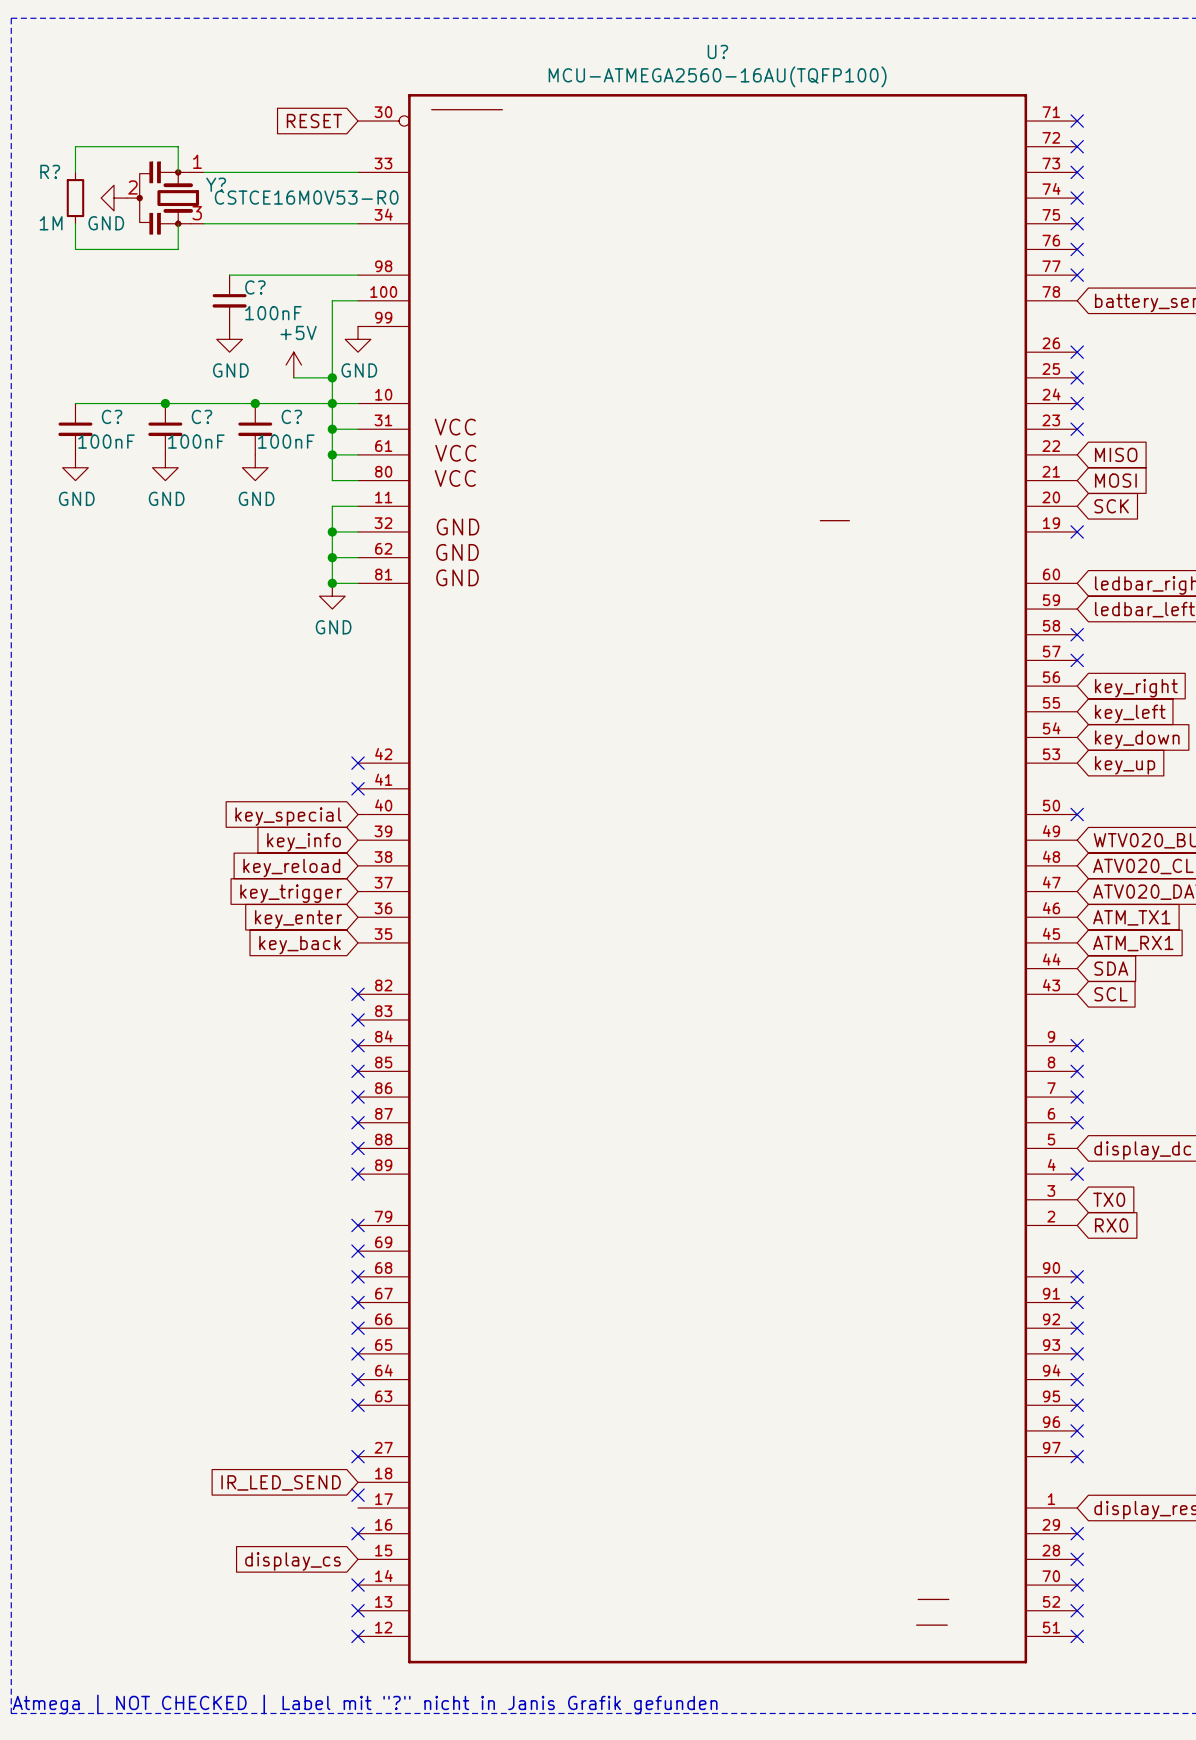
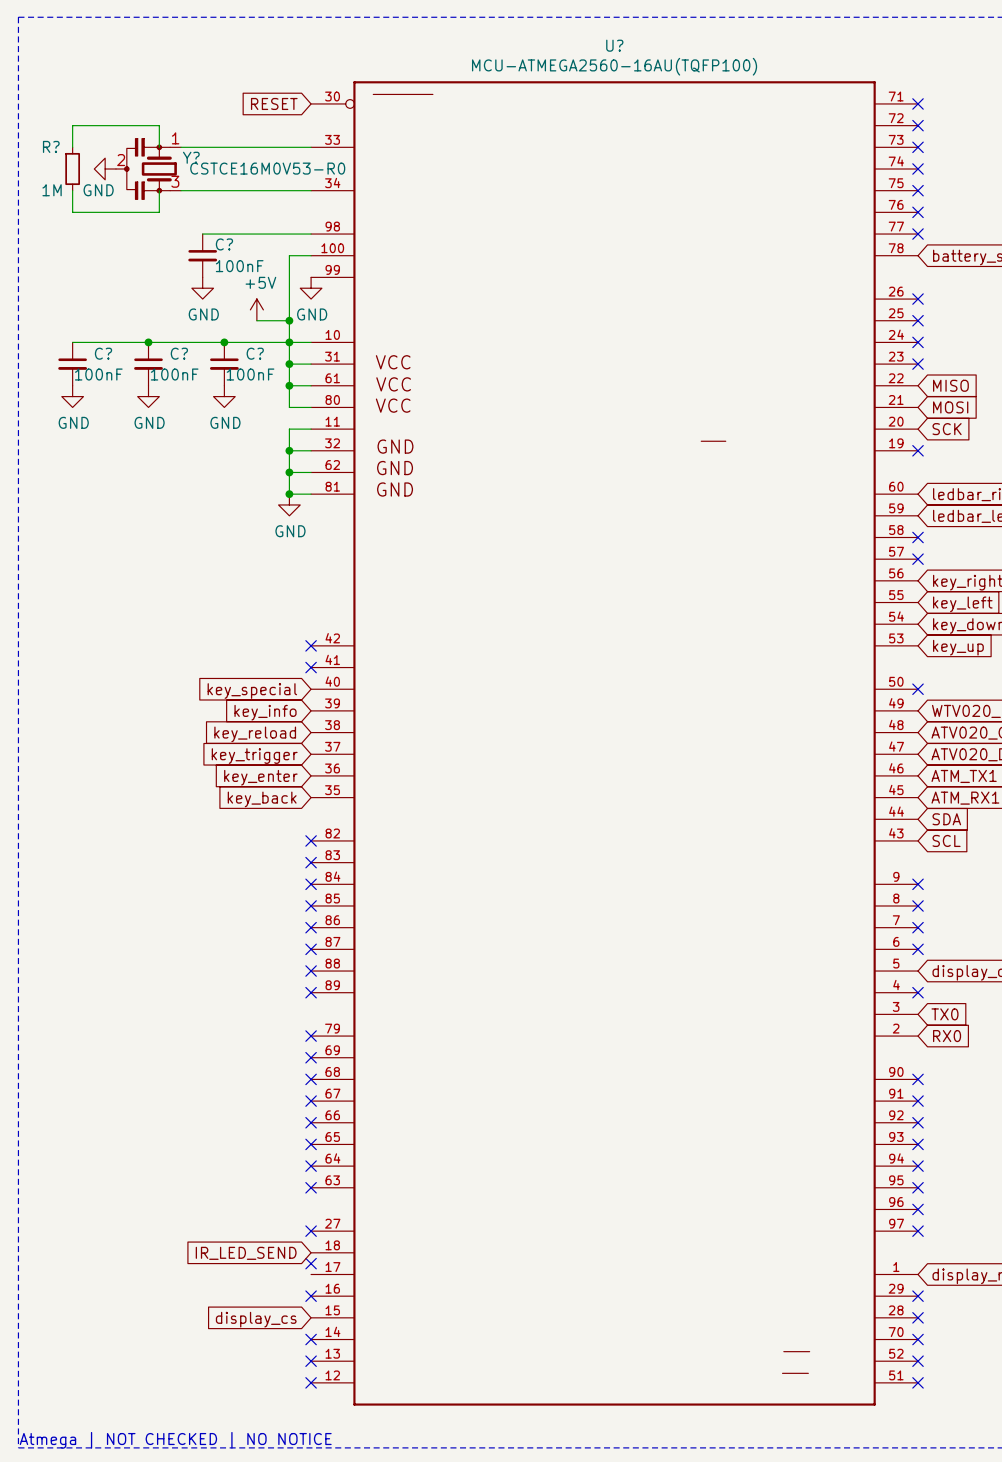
text: Atmega | NOT CHECKED | Label mit "?" nicht in Janis Grafik gefunden (365, 1704) -> Atmega | NOT CHECKED | NO NOTICE (175, 1440)

